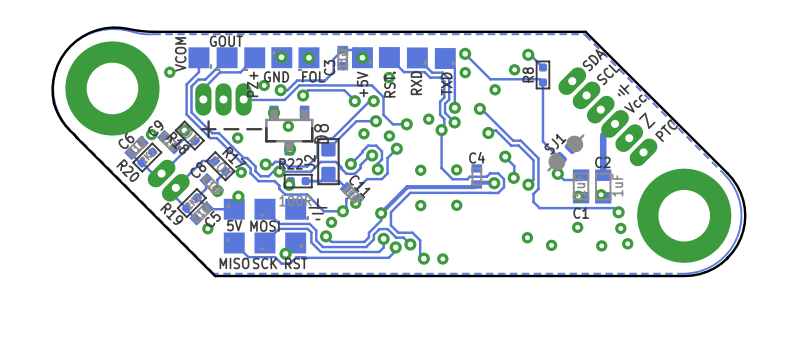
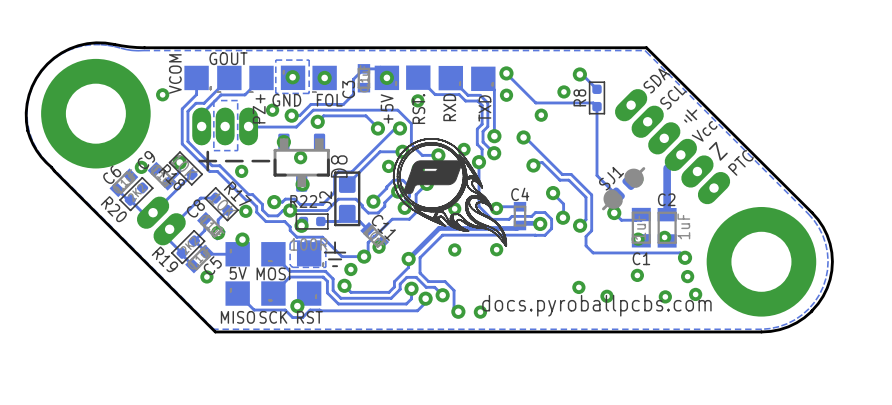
zone outline: none -> (309, 60) (309, 93) (275, 93) (275, 60) (309, 60)
zone outline: none -> (237, 100) (237, 150) (213, 150) (213, 100) (237, 100)
drawing: none -> [393, 138, 507, 247]
track: none -> (519, 206) (498, 206) (496, 208)
zone outline: none -> (321, 241) (292, 241) (290, 243) (290, 264) (292, 267) (325, 267) (325, 245) (321, 241)
text: none -> docs.pyroballpcbs.com (596, 305)

